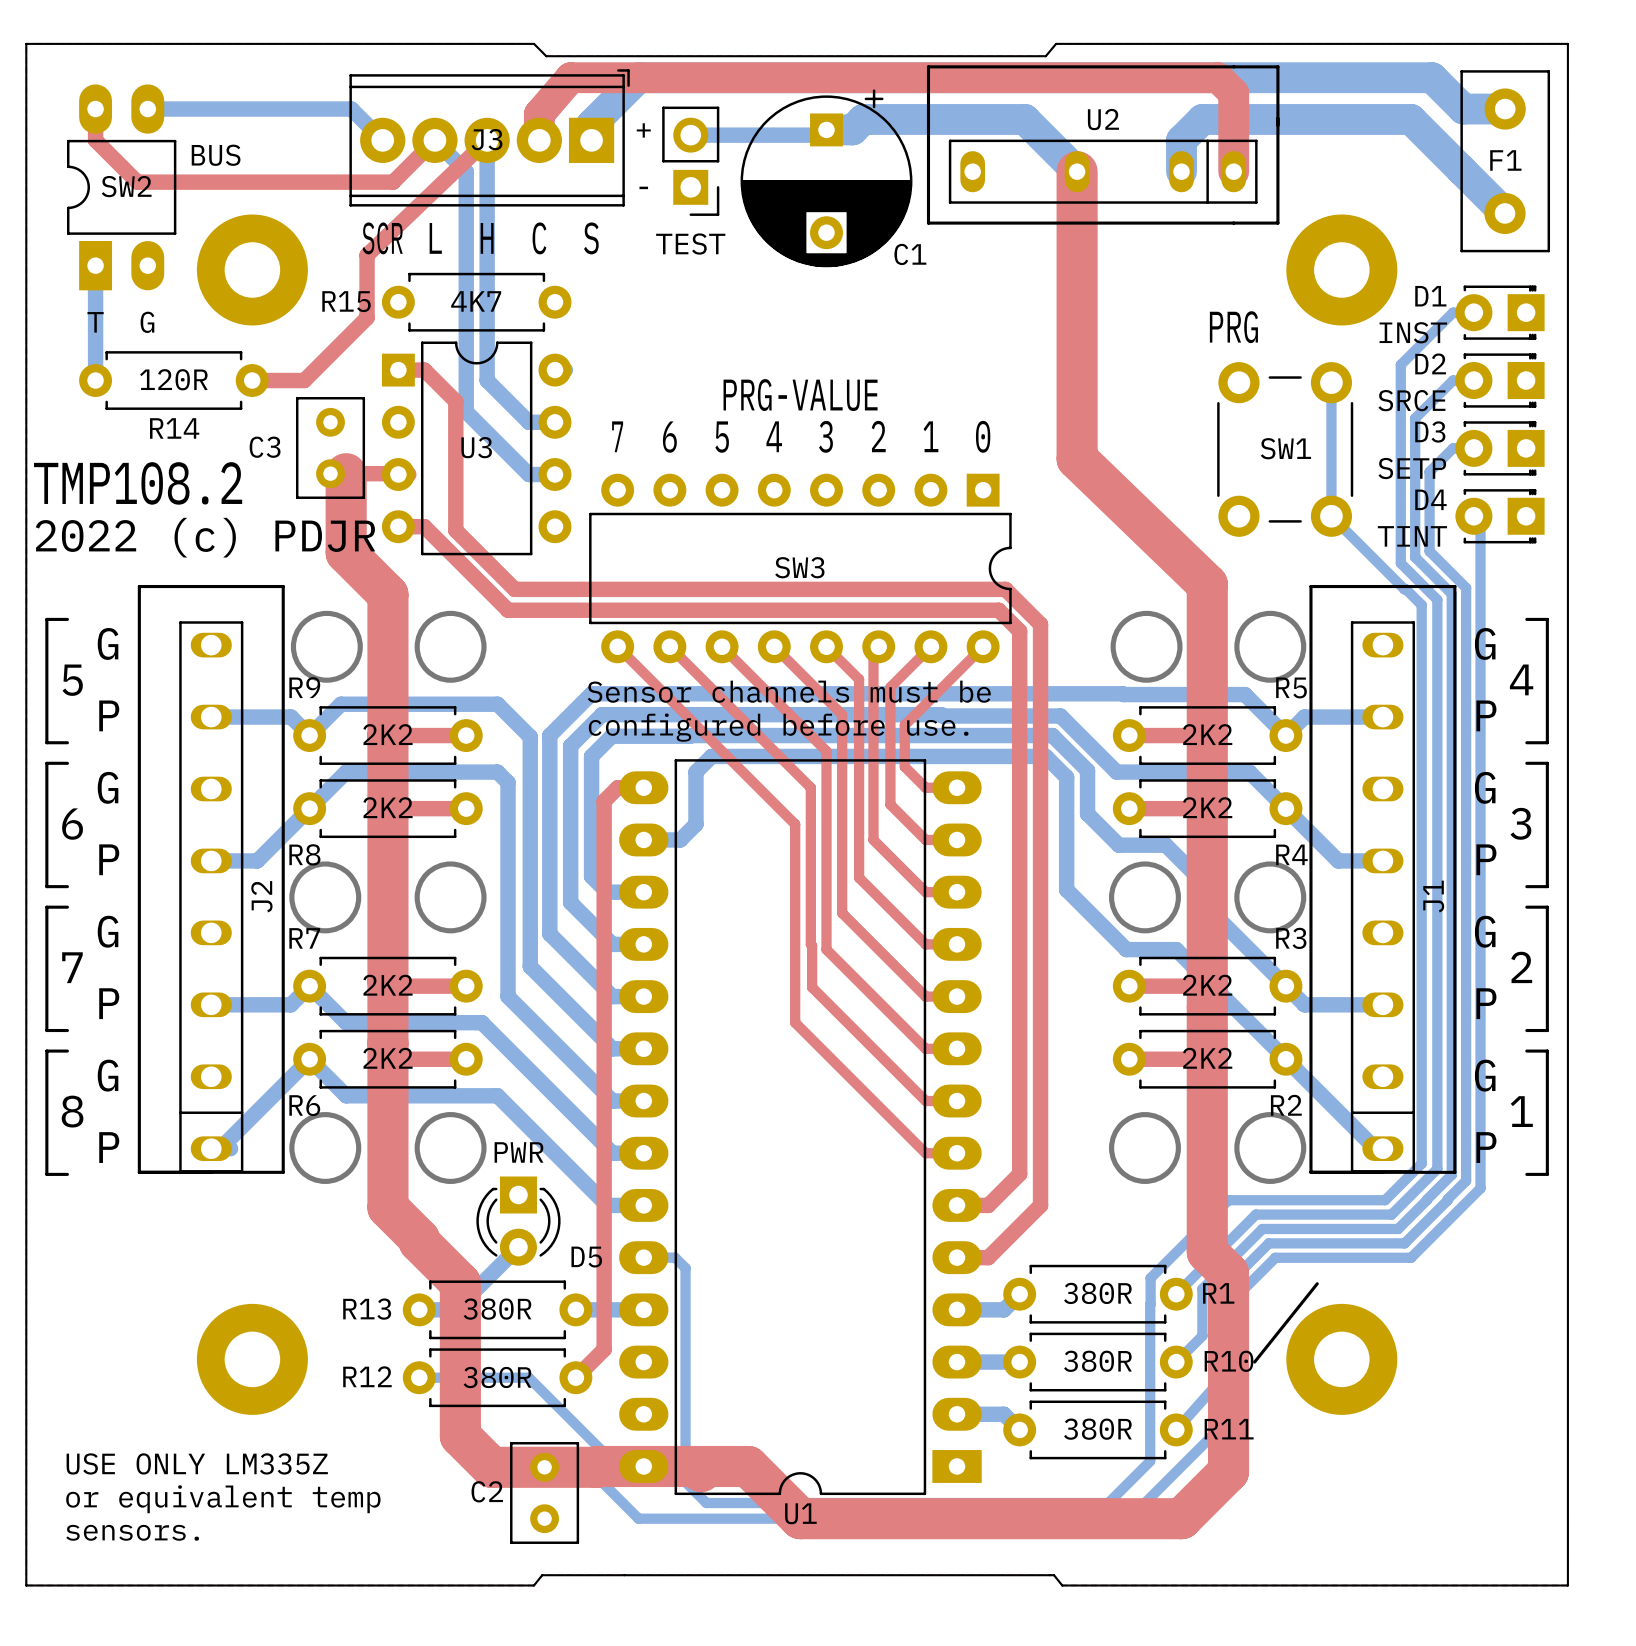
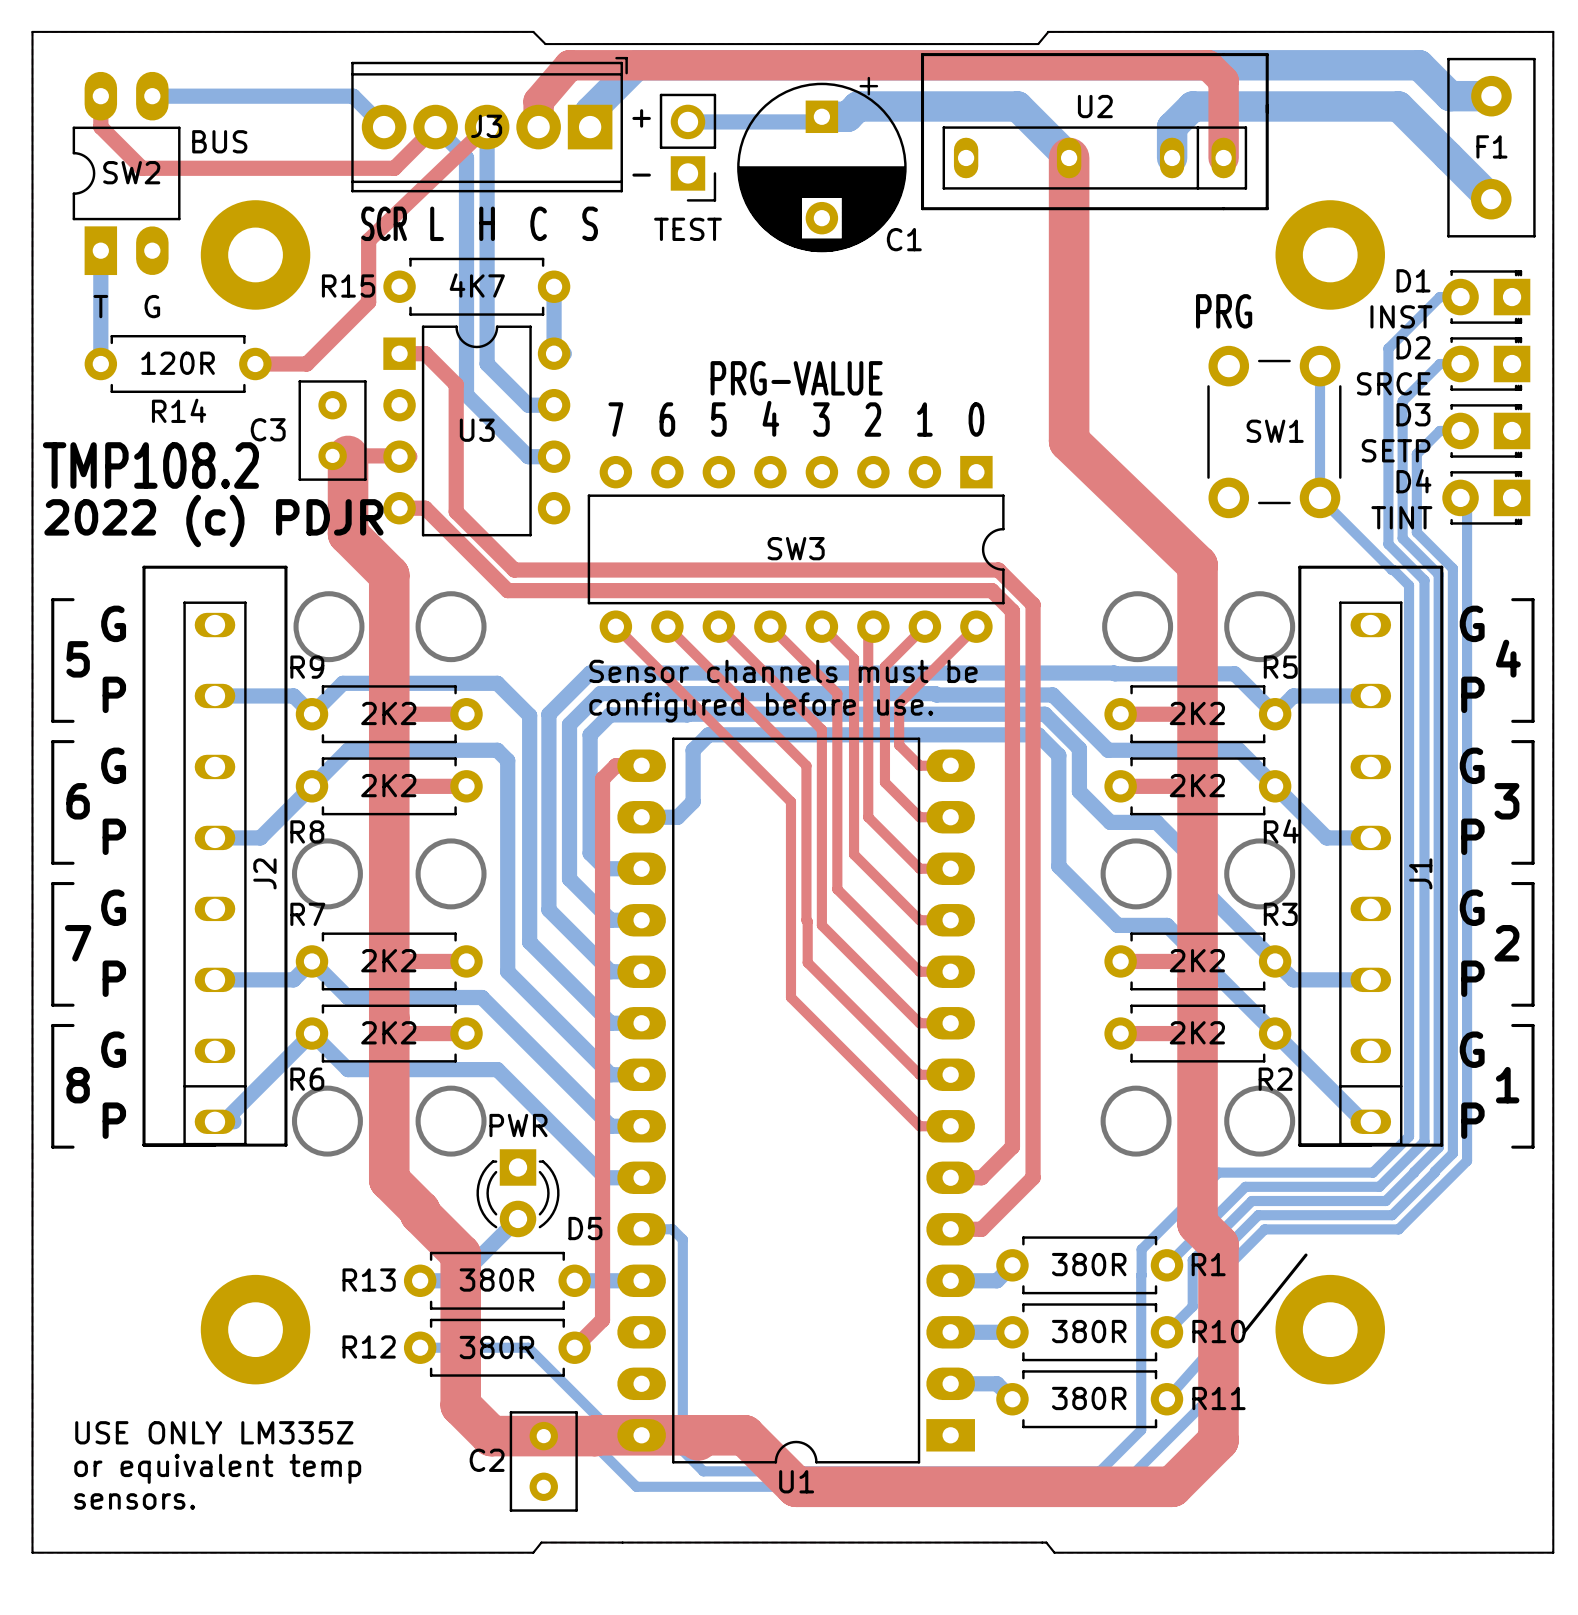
bottom track: none -> (554, 286) (554, 353)

